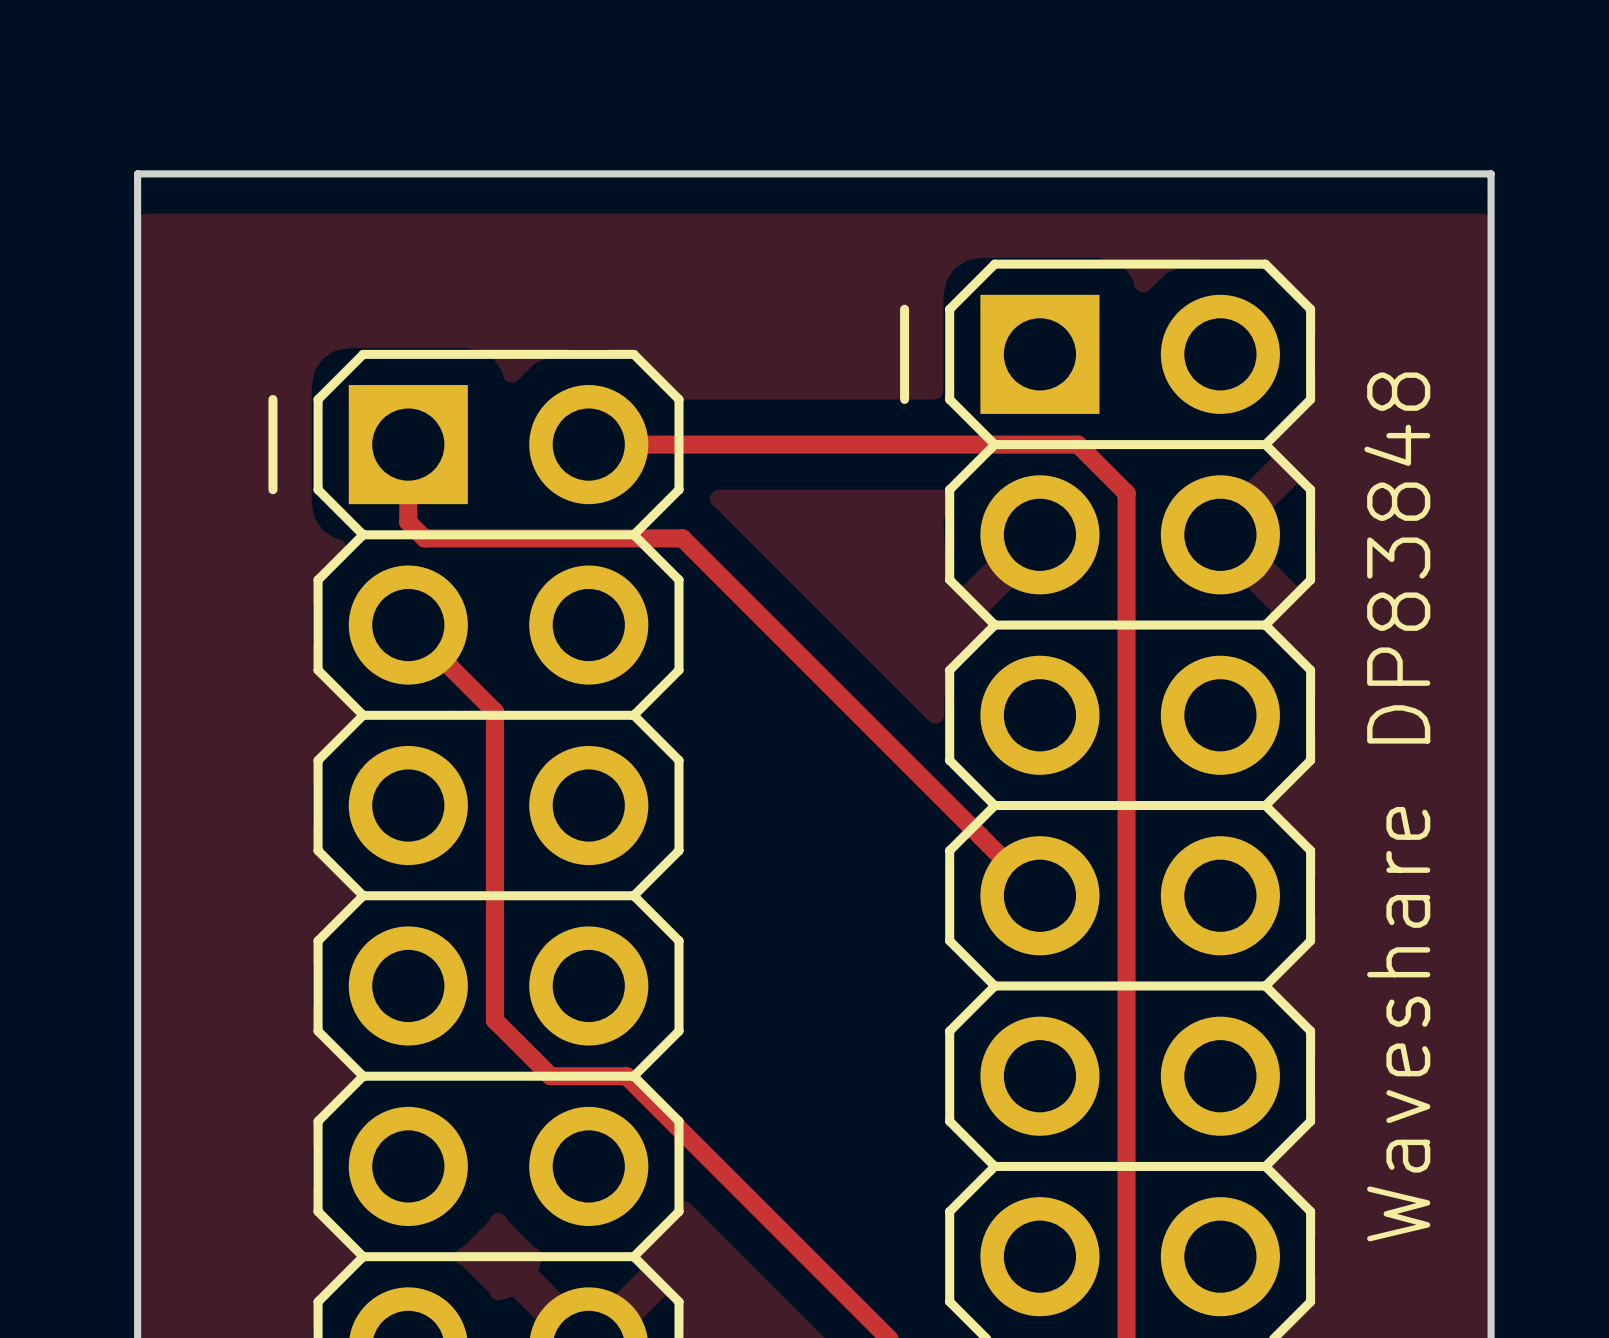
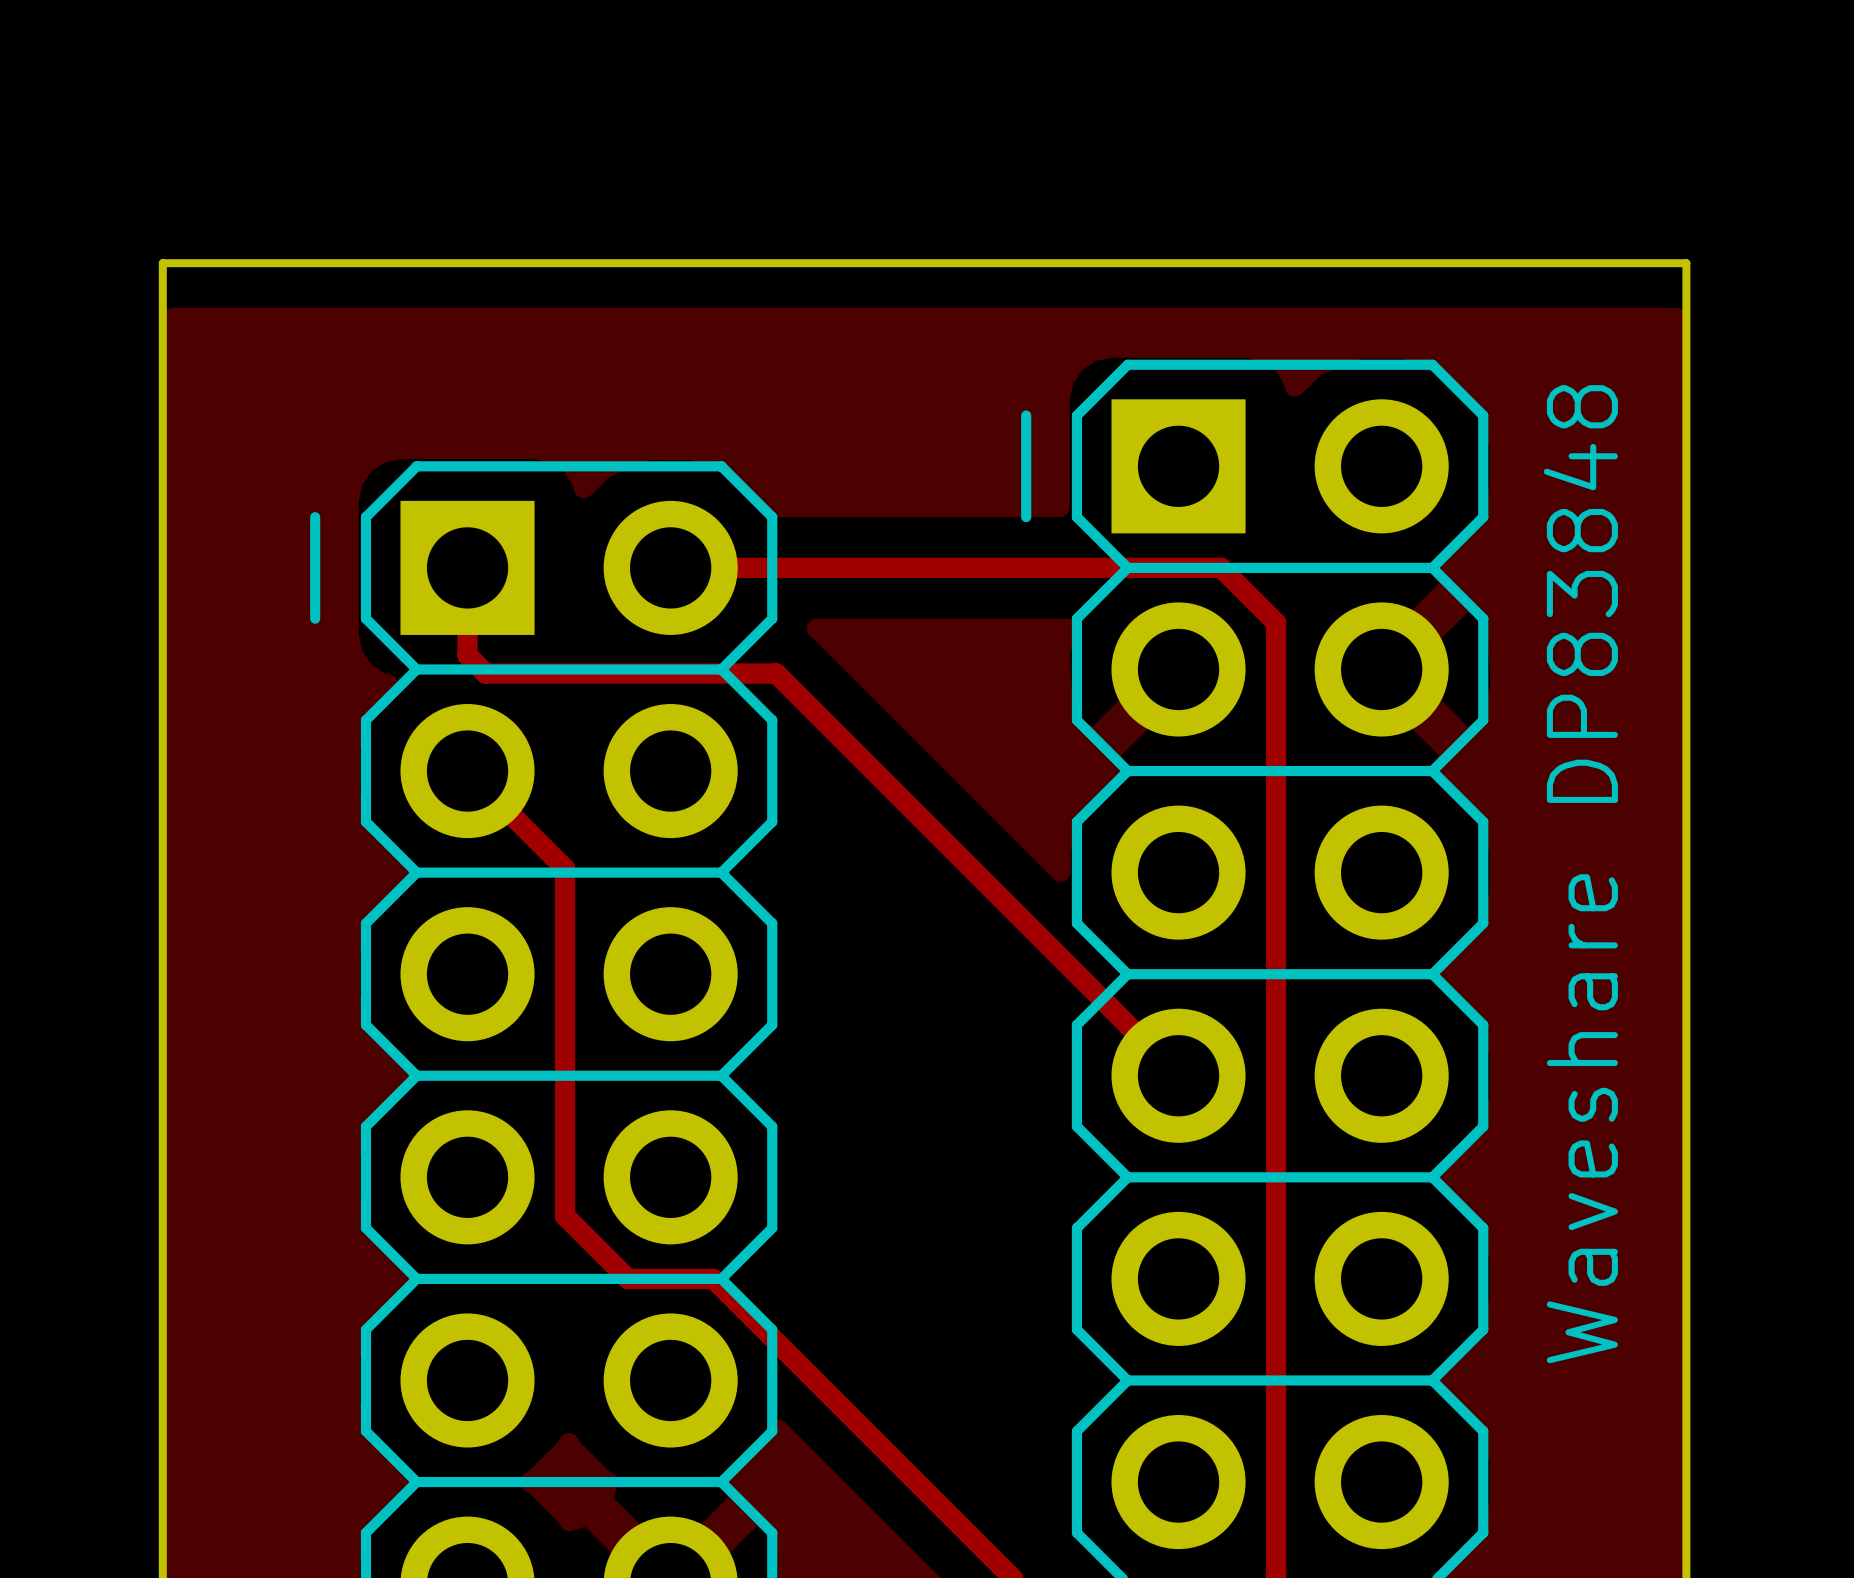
part value position: Waveshare DP83848 (1397, 806) -> Waveshare DP83848 (1580, 874)

